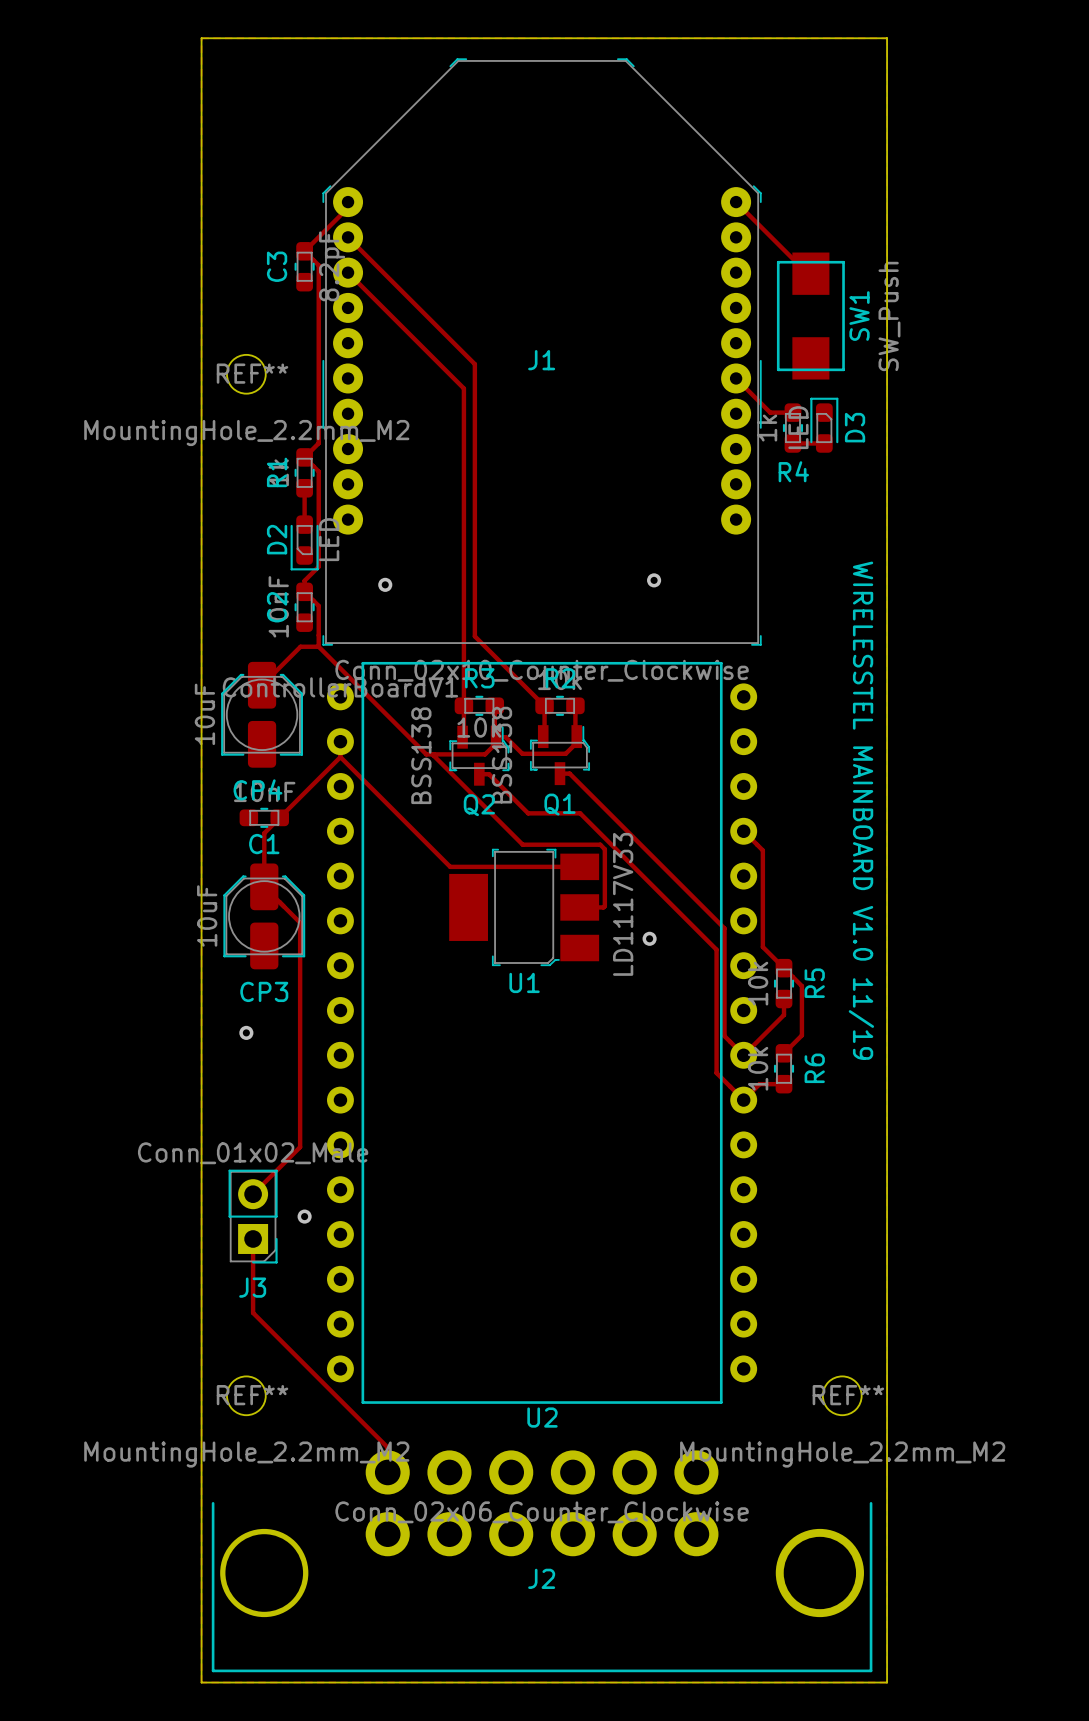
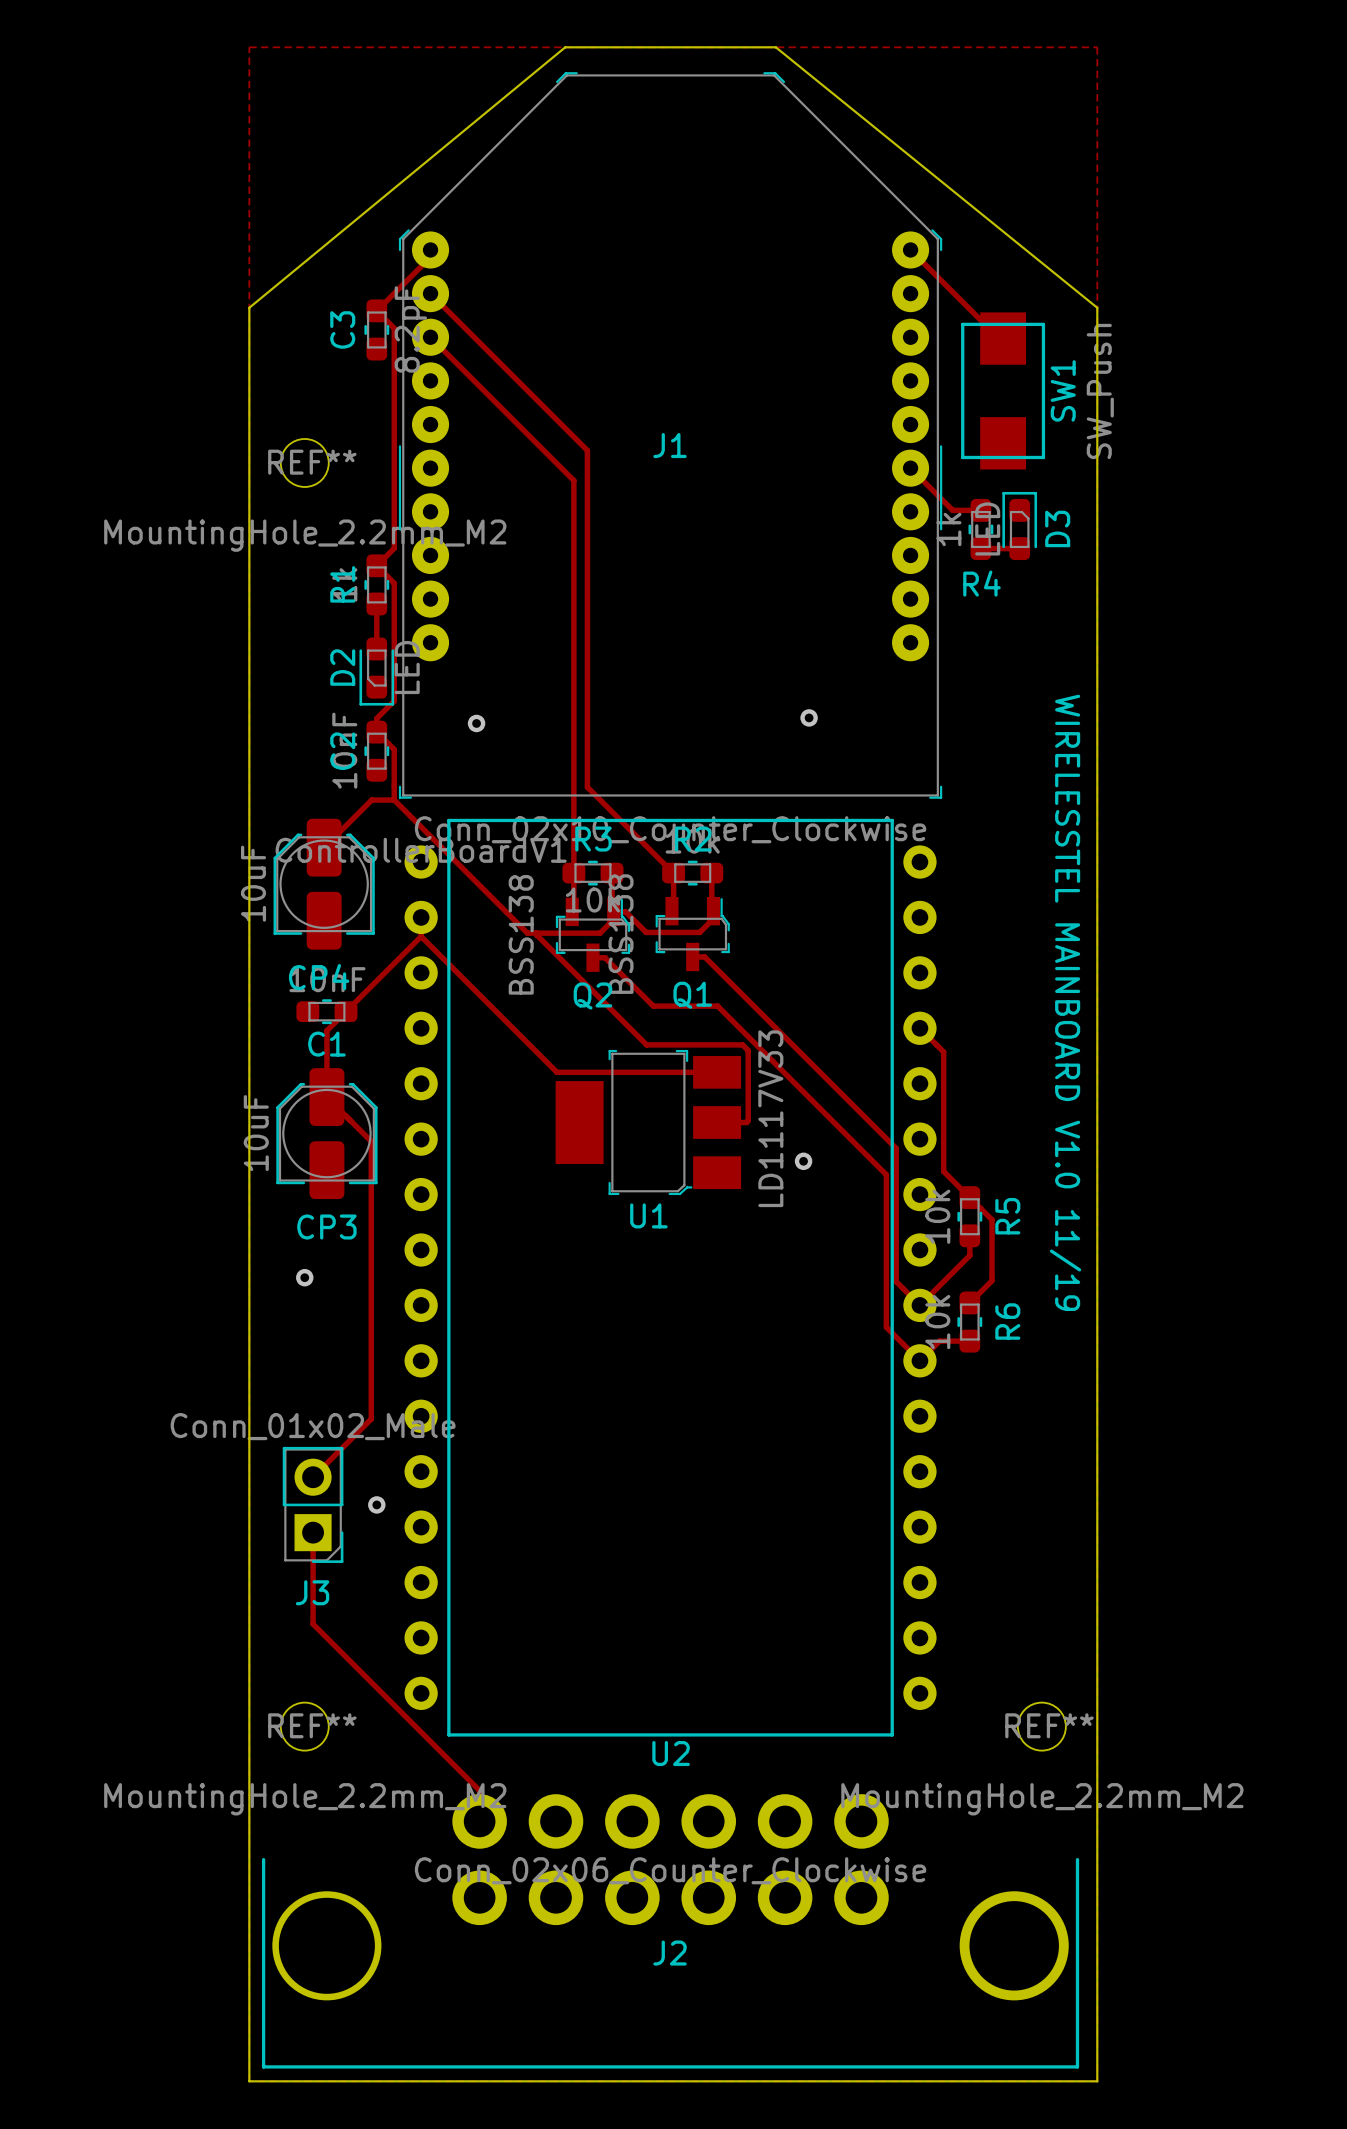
board edge: (456, 38) (201, 38) (201, 248) -> (565, 47) (249, 307)
board edge: (627, 38) (887, 38) (887, 248) -> (775, 47) (1097, 307)

